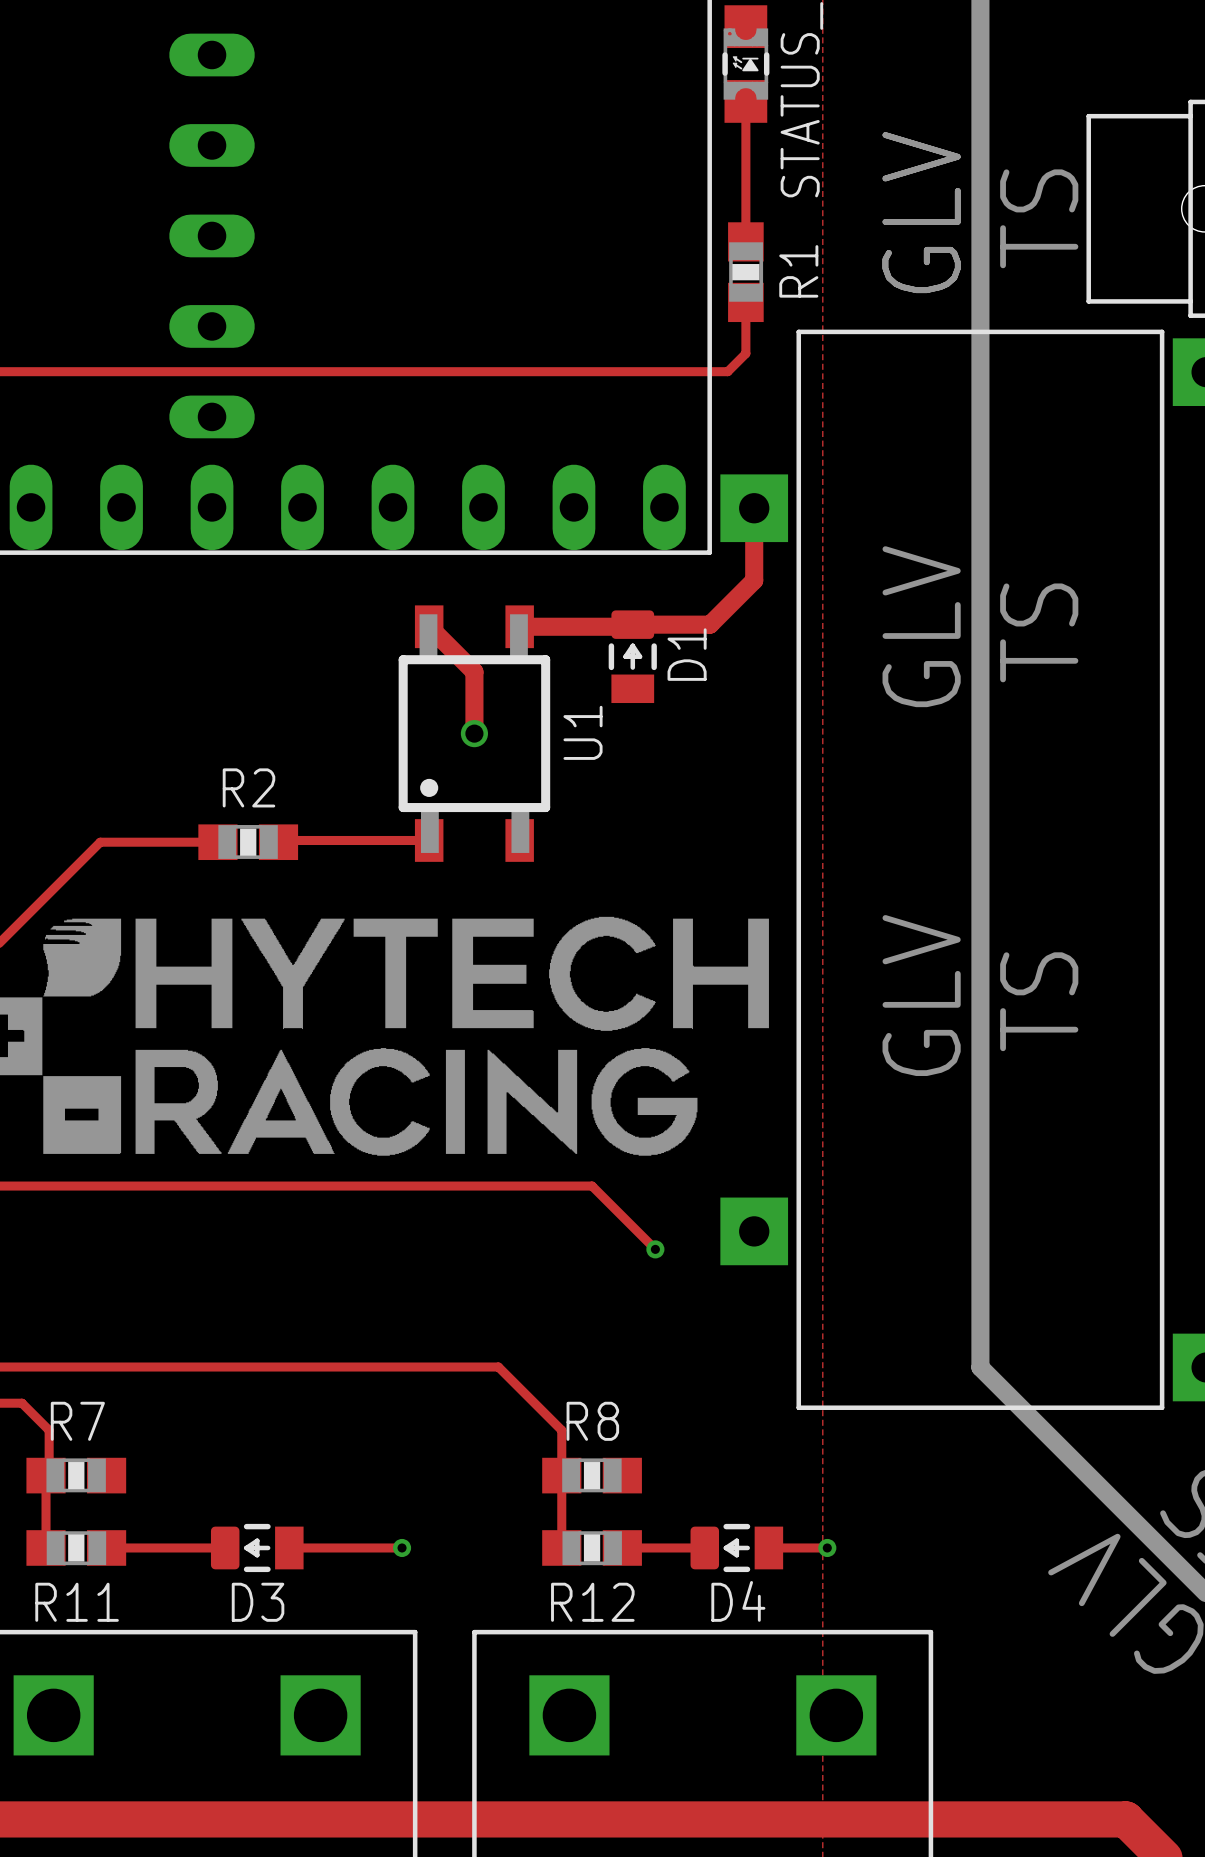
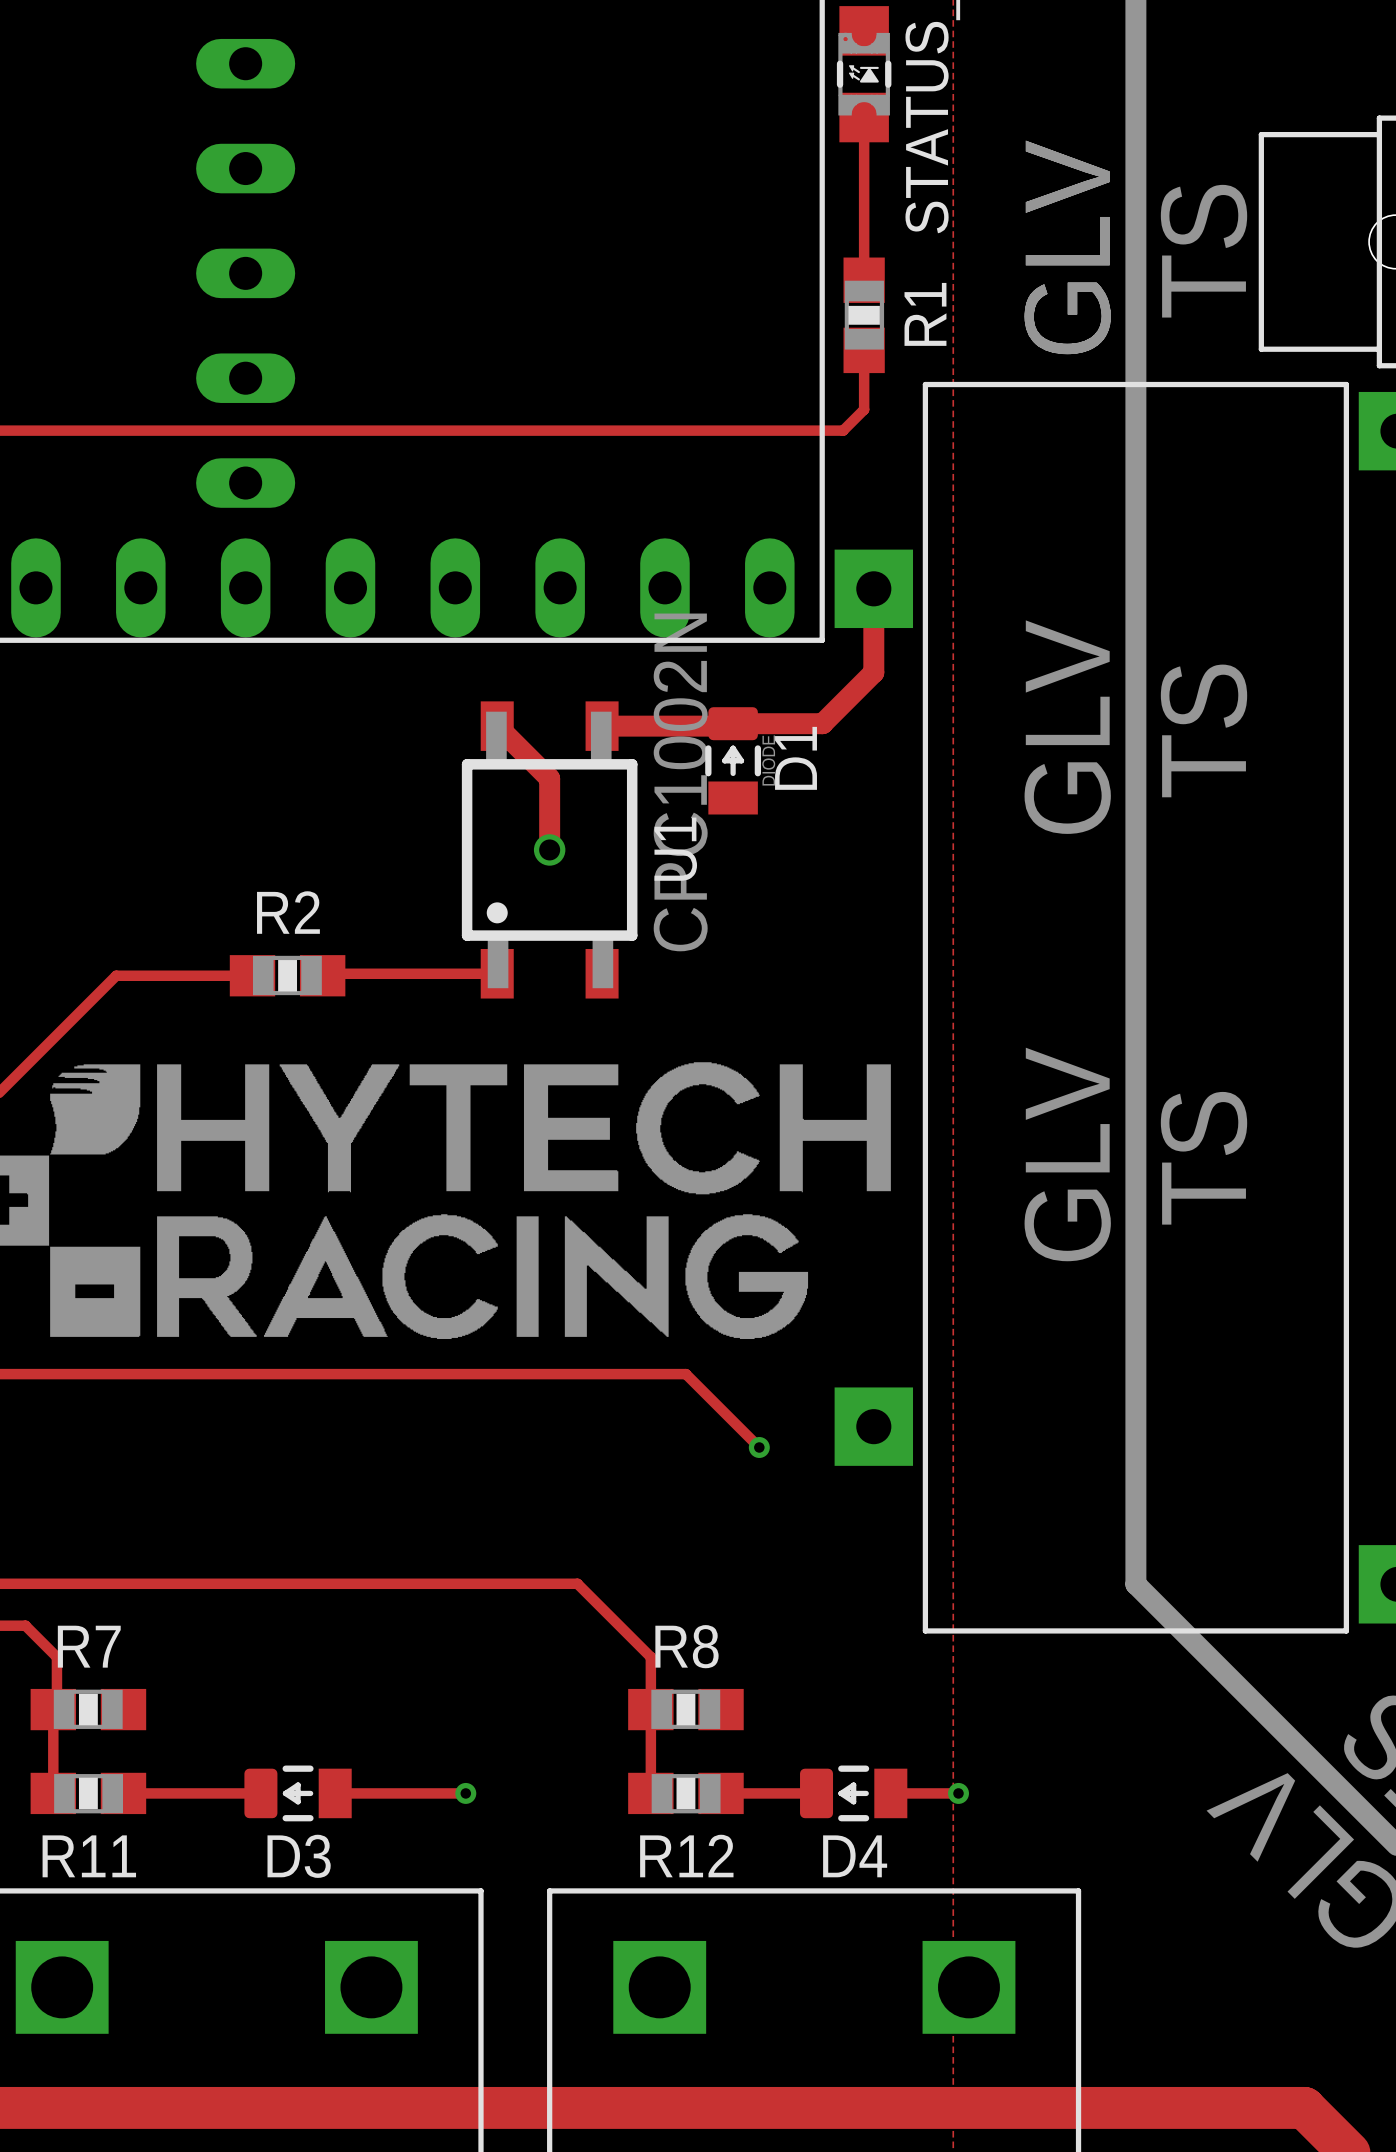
D1 value: none -> DIODE (768, 760)
U1 value: none -> CPC1002N (680, 782)

